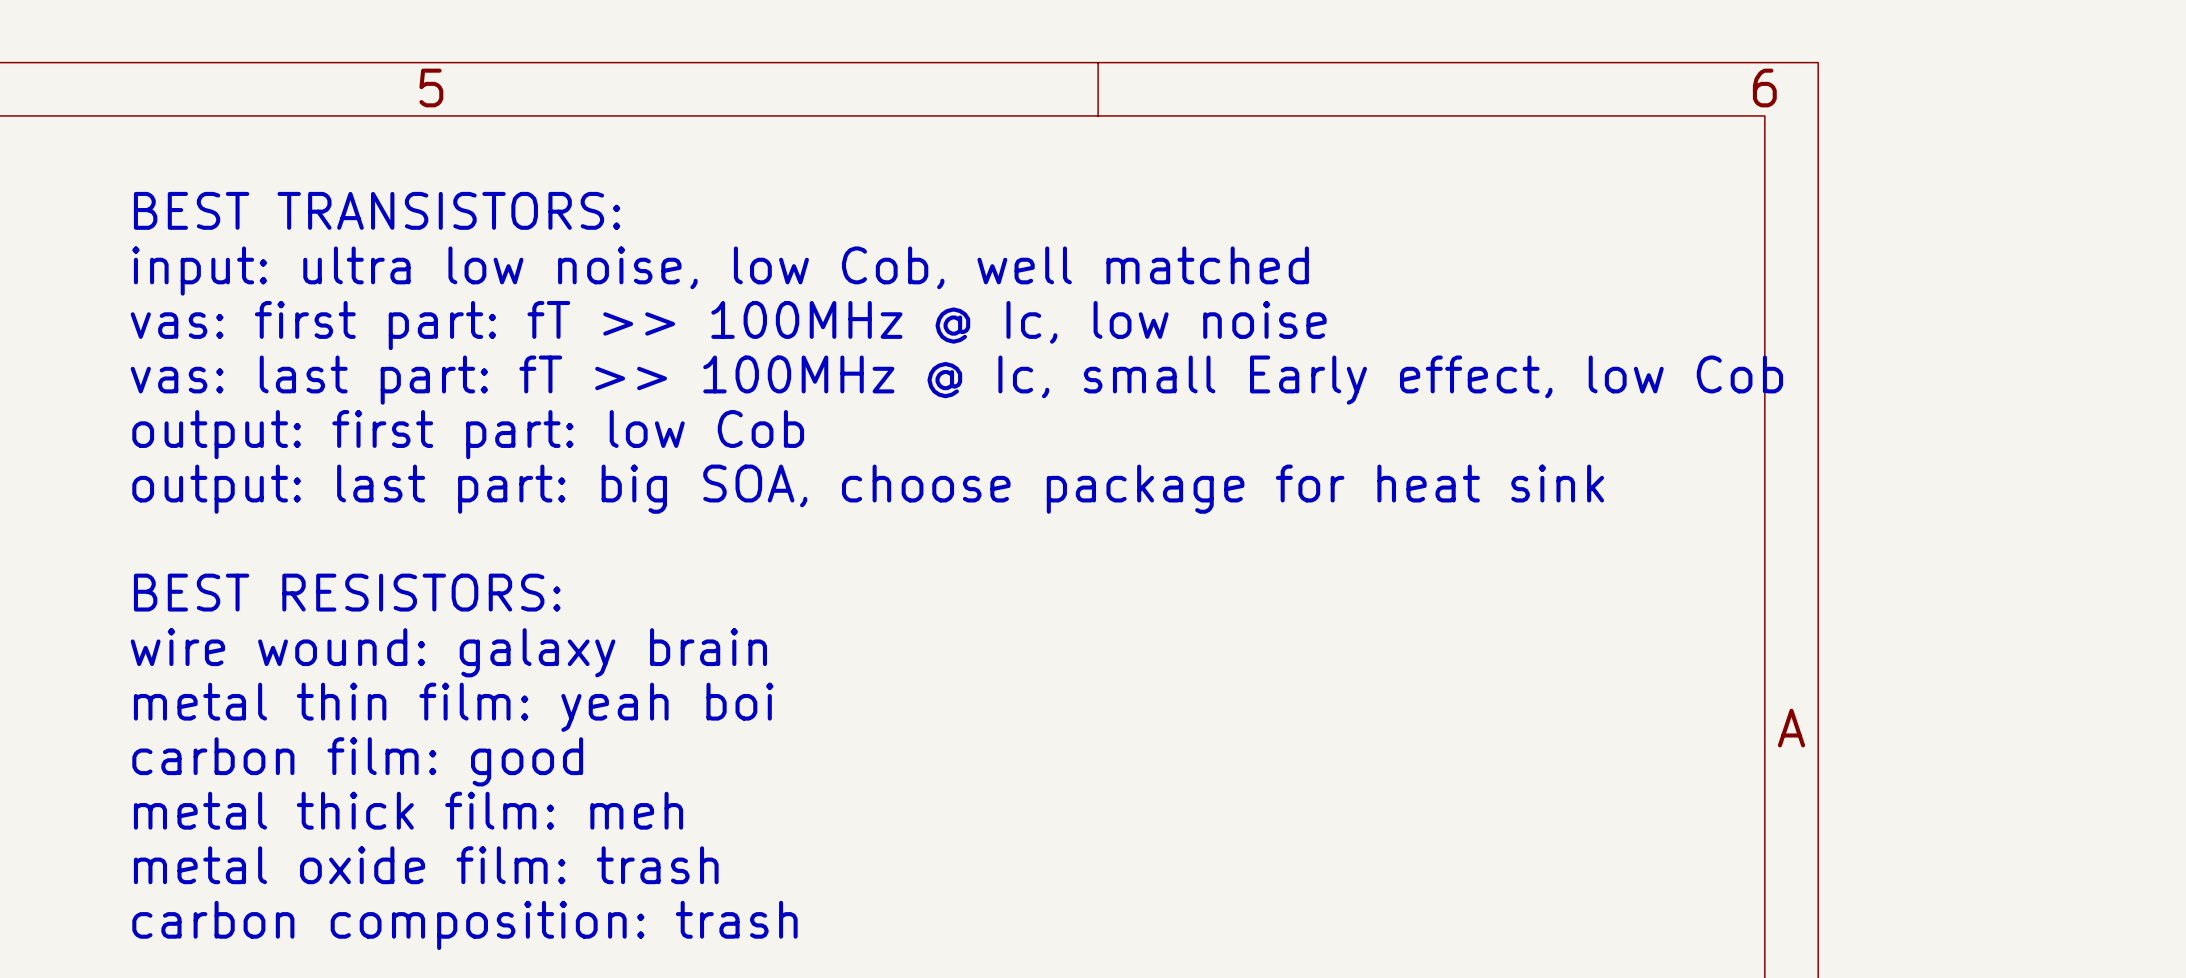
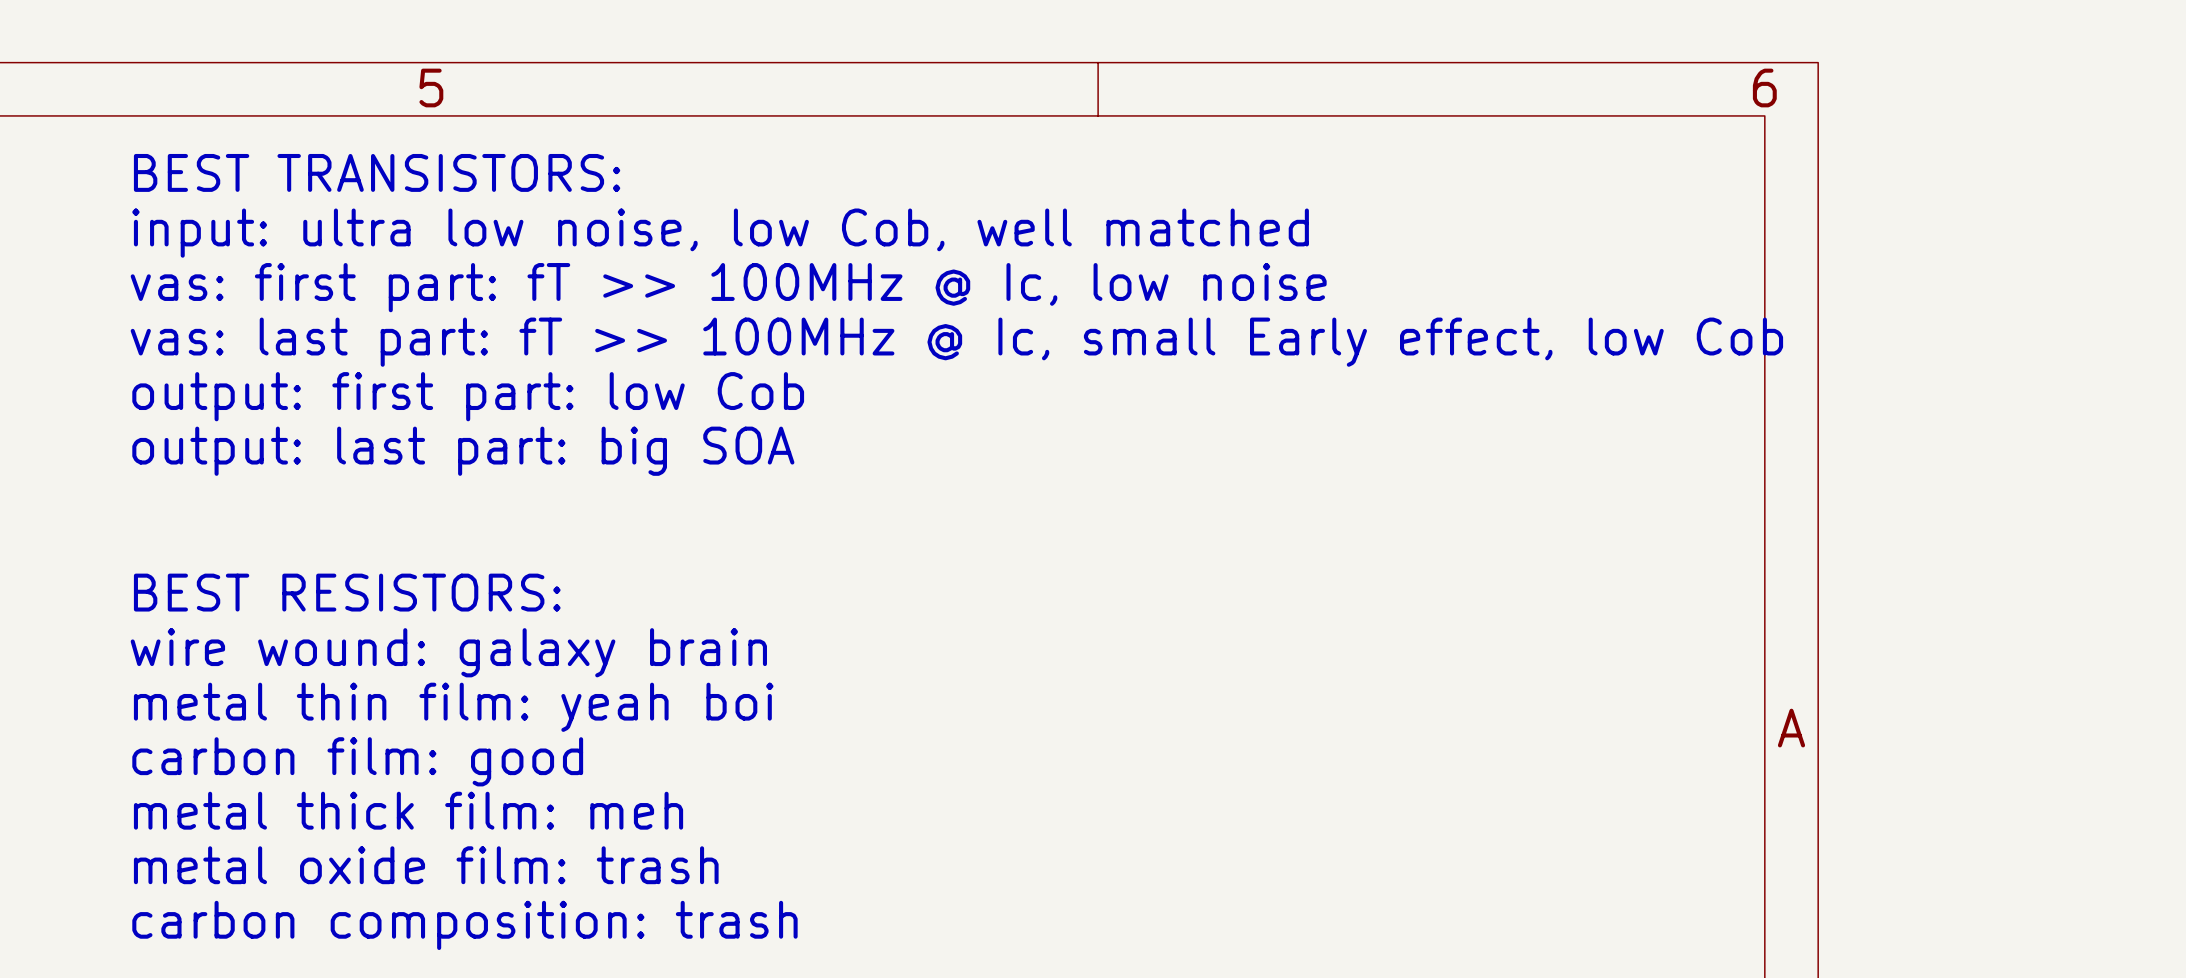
text position: BEST TRANSISTORS: (377, 210) -> BEST TRANSISTORS: (377, 172)
text position: input: ultra low noise, low Cob, well matched (720, 271) -> input: ultra low noise, low Cob, well matched (720, 233)
text position: vas: first part: fT >> 100MHz @ Ic, low noise (728, 325) -> vas: first part: fT >> 100MHz @ Ic, low noise (728, 287)
text position: vas: last part: fT >> 100MHz @ Ic, small Early effect, low Cob (956, 380) -> vas: last part: fT >> 100MHz @ Ic, small Early effect, low Cob (956, 342)
text position: output: first part: low Cob (468, 434) -> output: first part: low Cob (468, 396)
text: output: last part: big SOA, choose package for heat sink (868, 489) -> output: last part: big SOA (463, 451)

